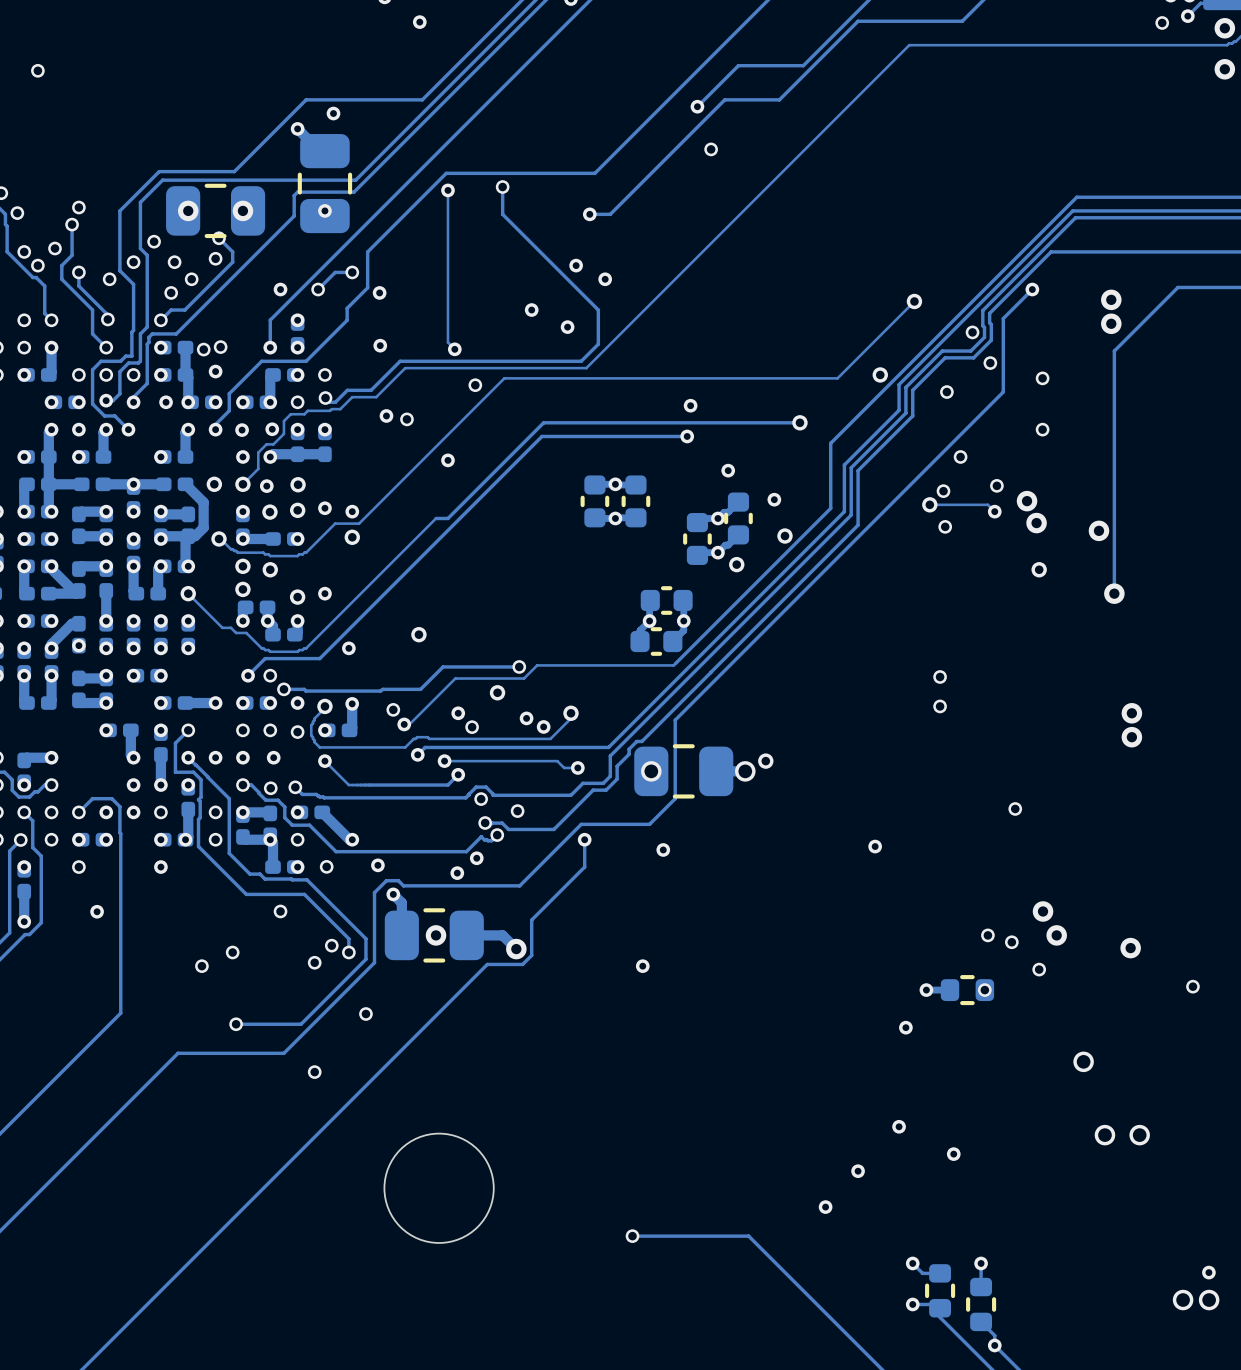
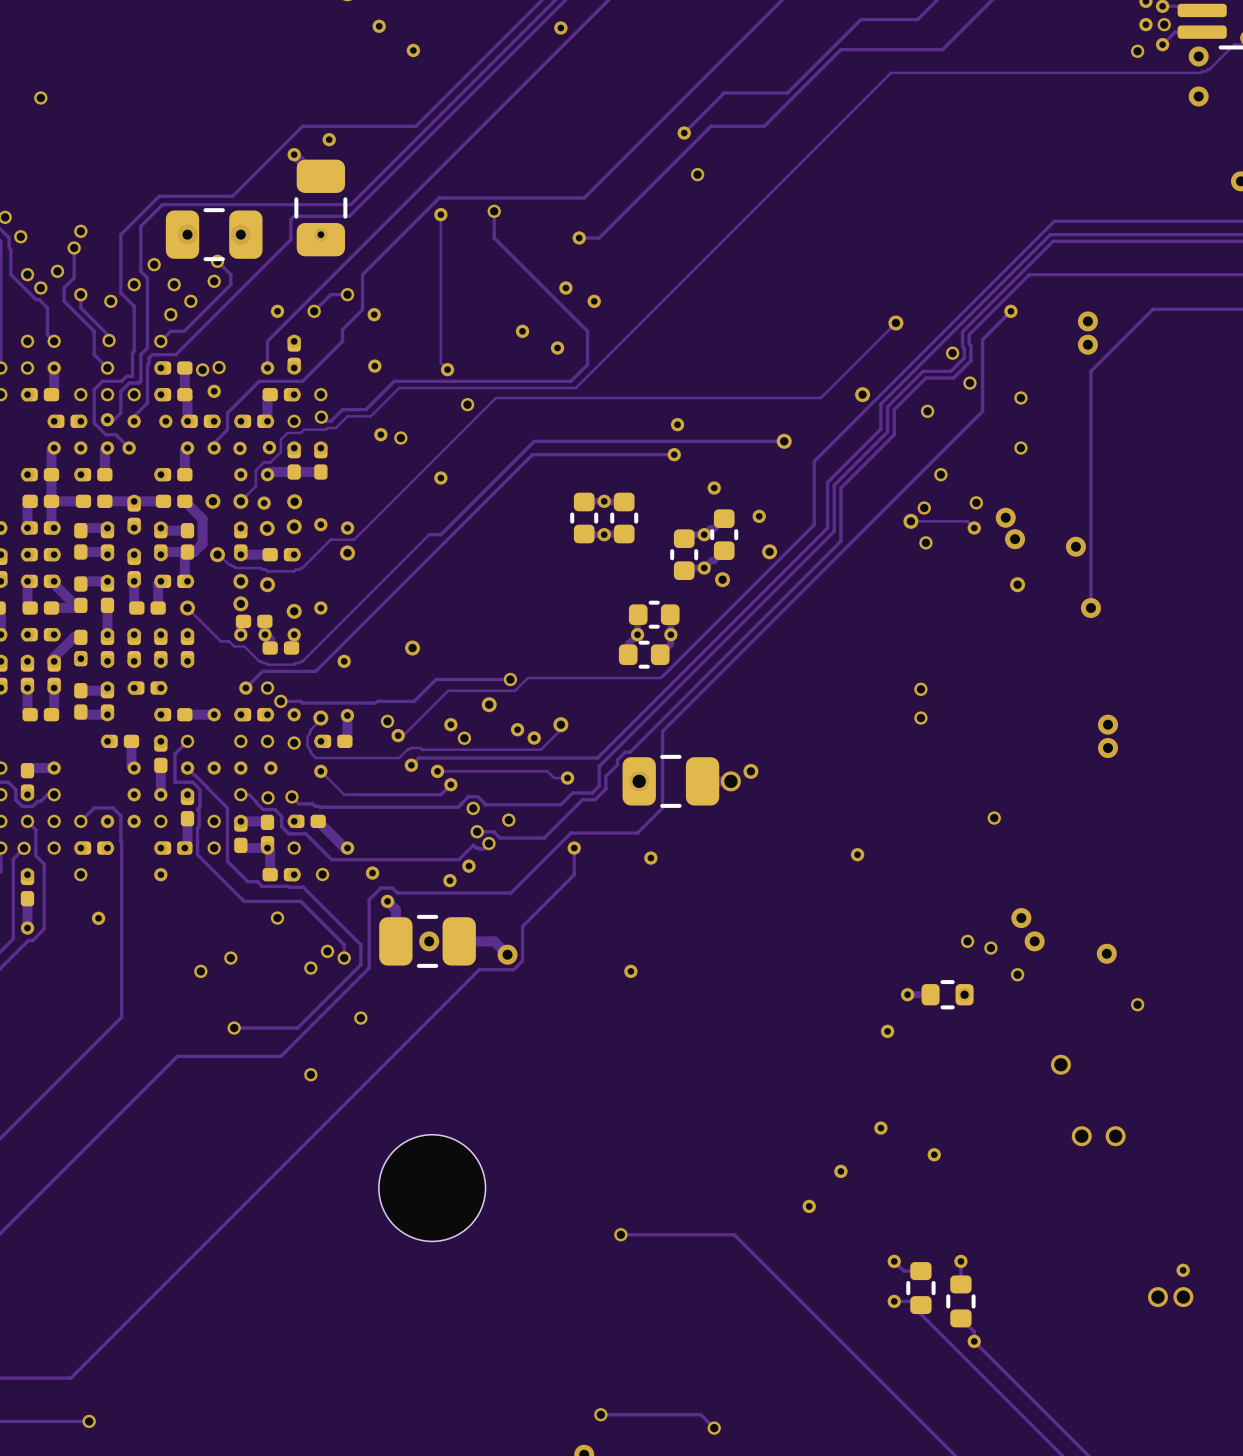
via position: (1192, 986) -> (1137, 1004)

